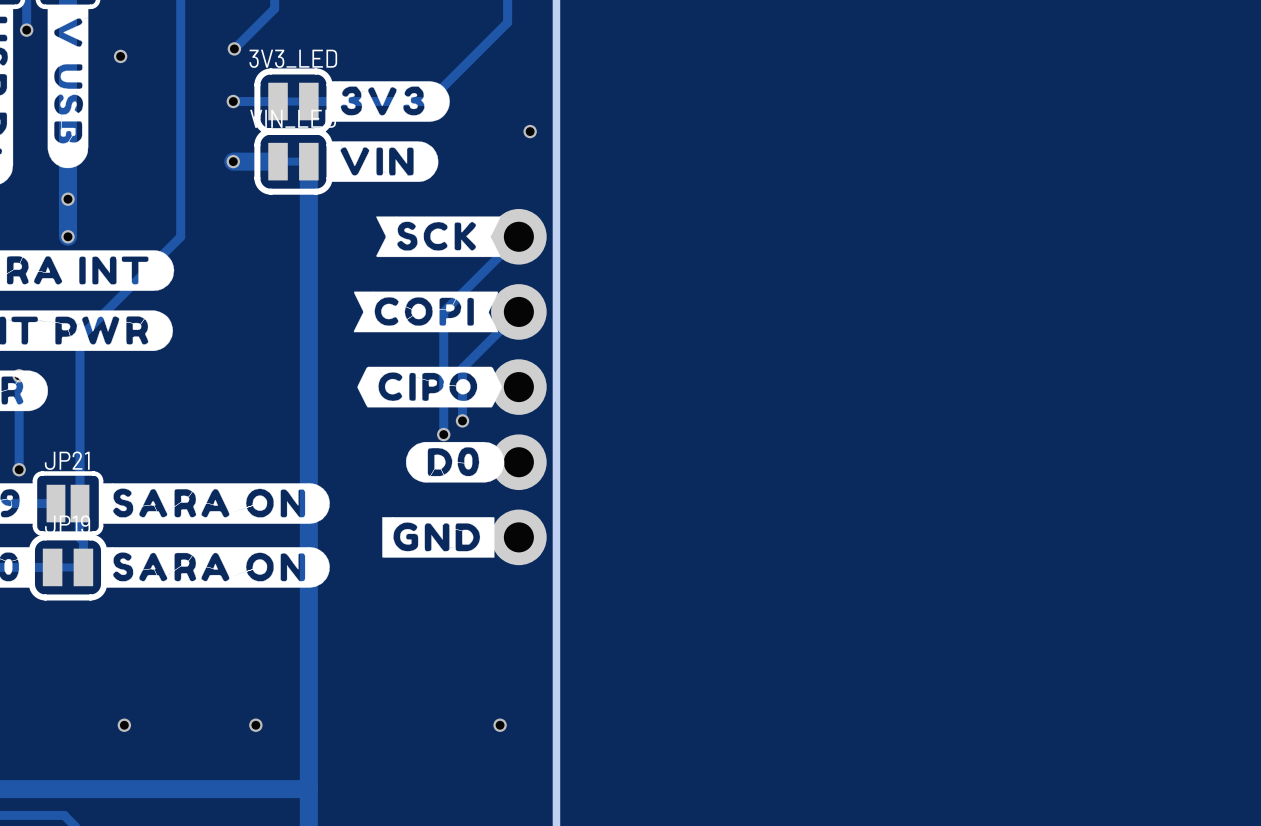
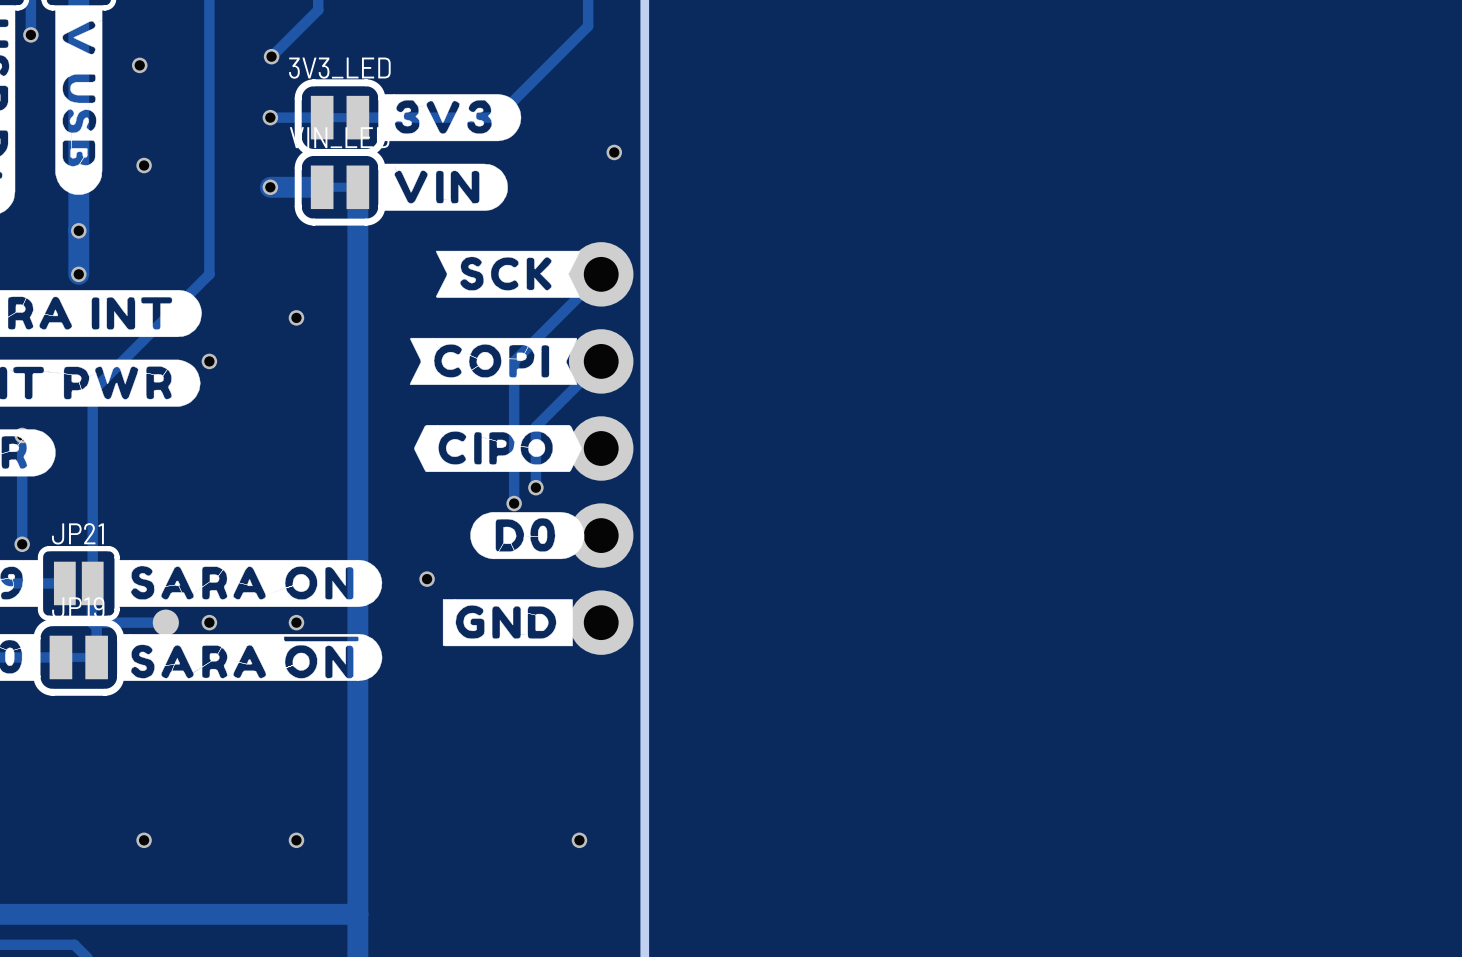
via: none -> (144, 165)
via: none -> (296, 317)
via: none -> (209, 361)
via: none -> (427, 579)
track: none -> (165, 622) (91, 622)
part: none -> (165, 622)
via: none -> (209, 622)
via: none -> (296, 622)
drawing shape: [101, 547, 330, 588] -> [117, 633, 383, 681]

